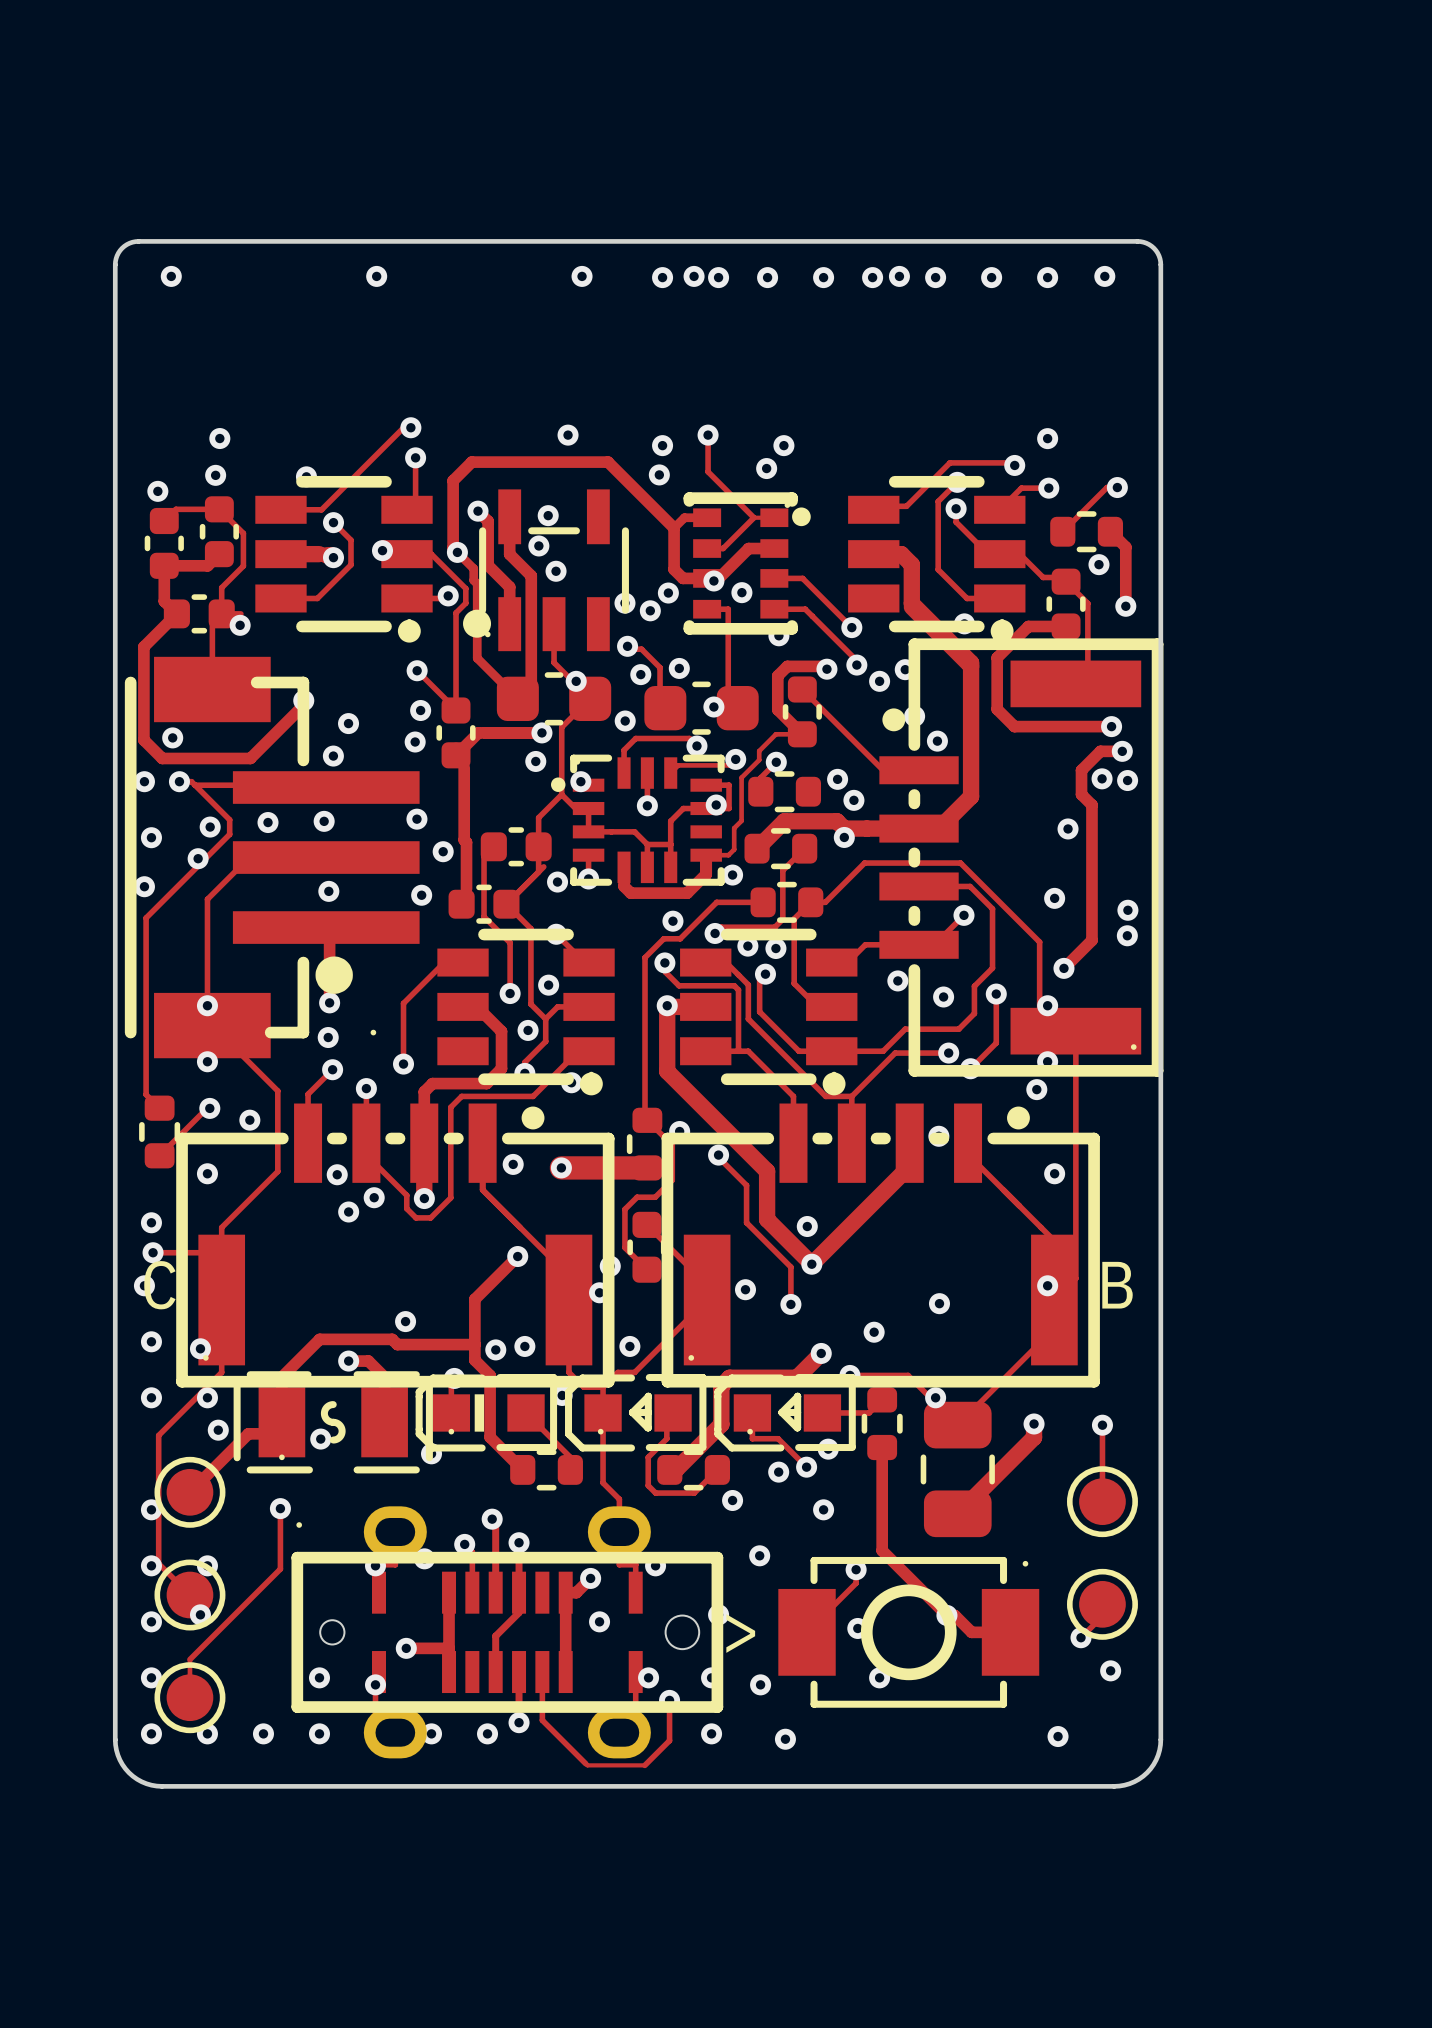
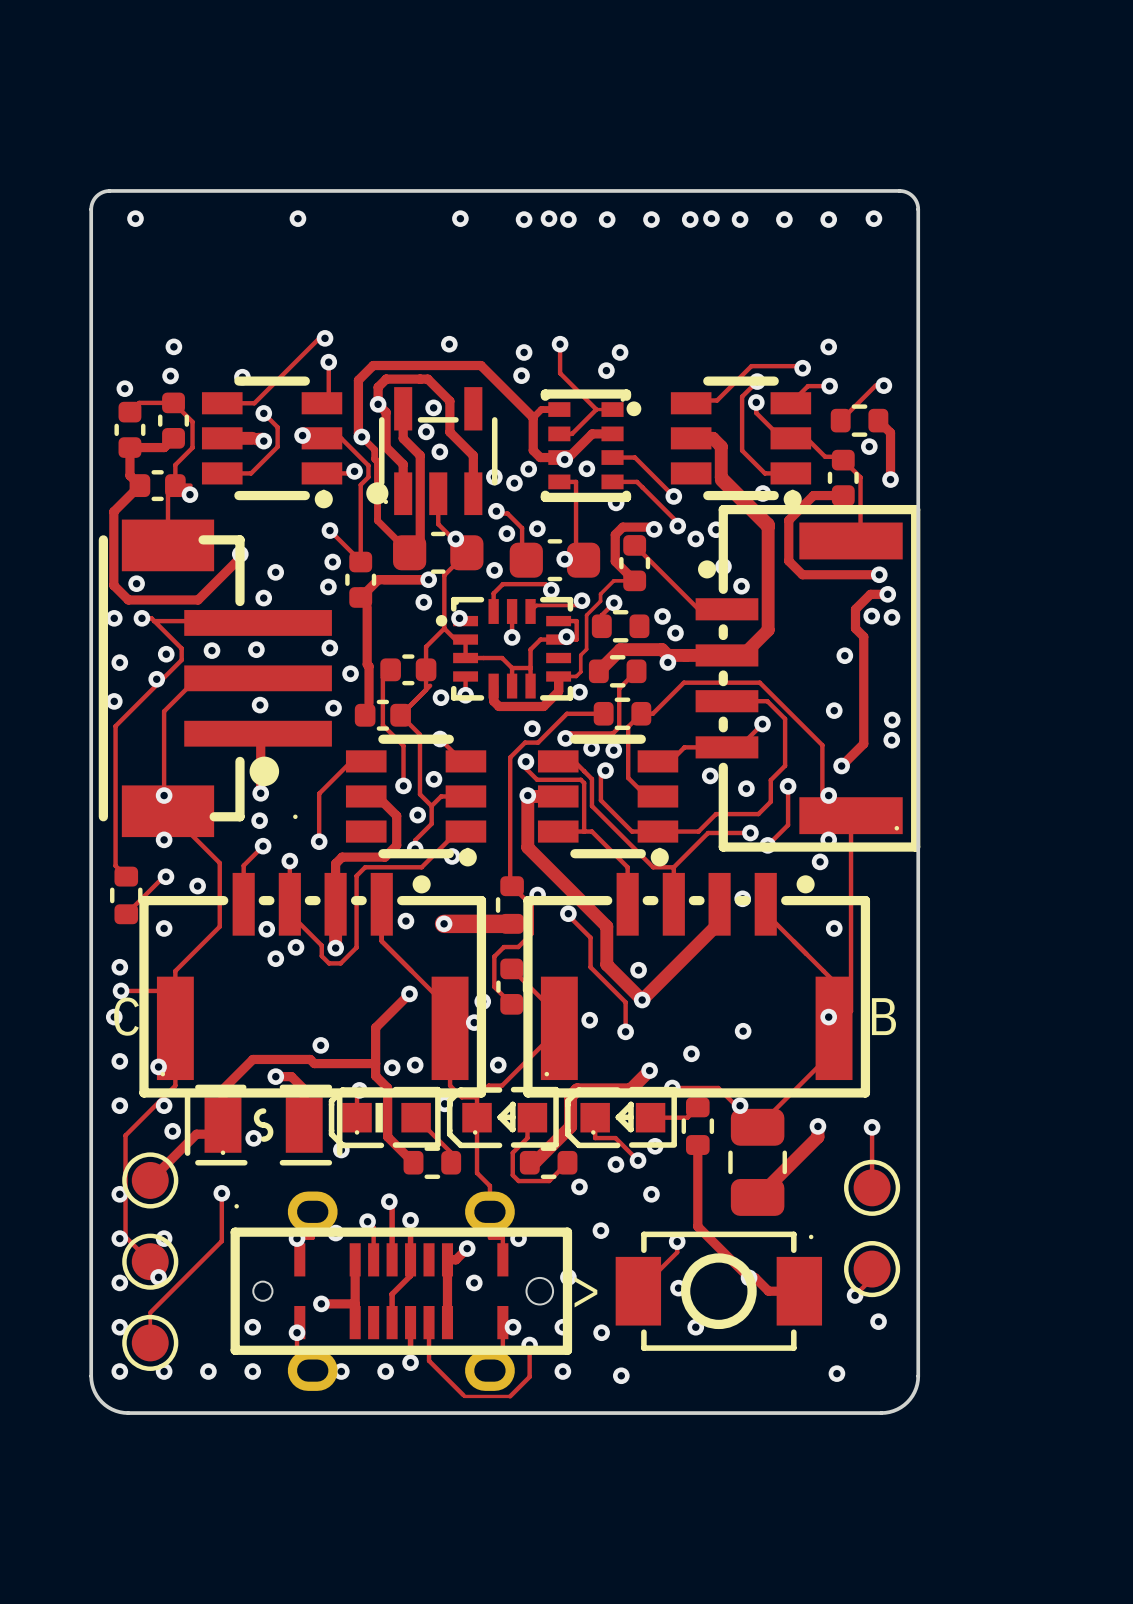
track: none -> (378, 404) (378, 387) (386, 379) (427, 379) (449, 401) (449, 432) (473, 455) (473, 493)

